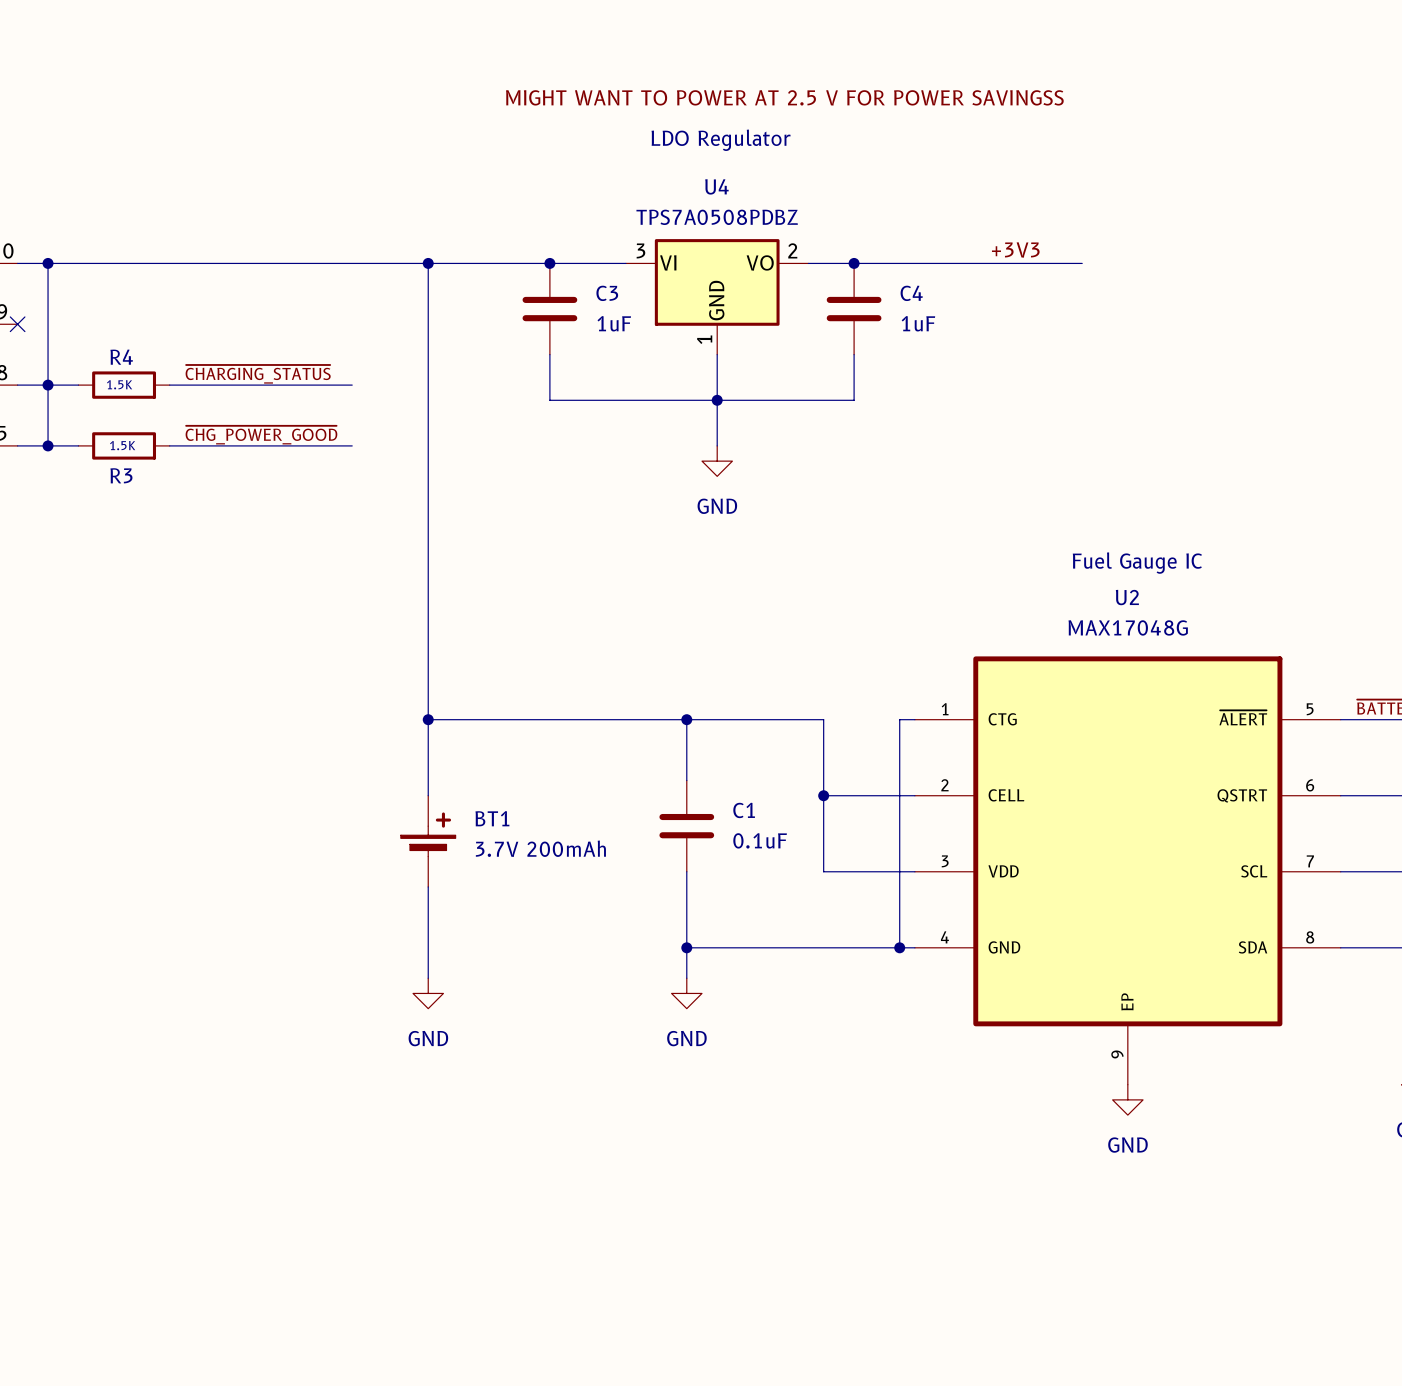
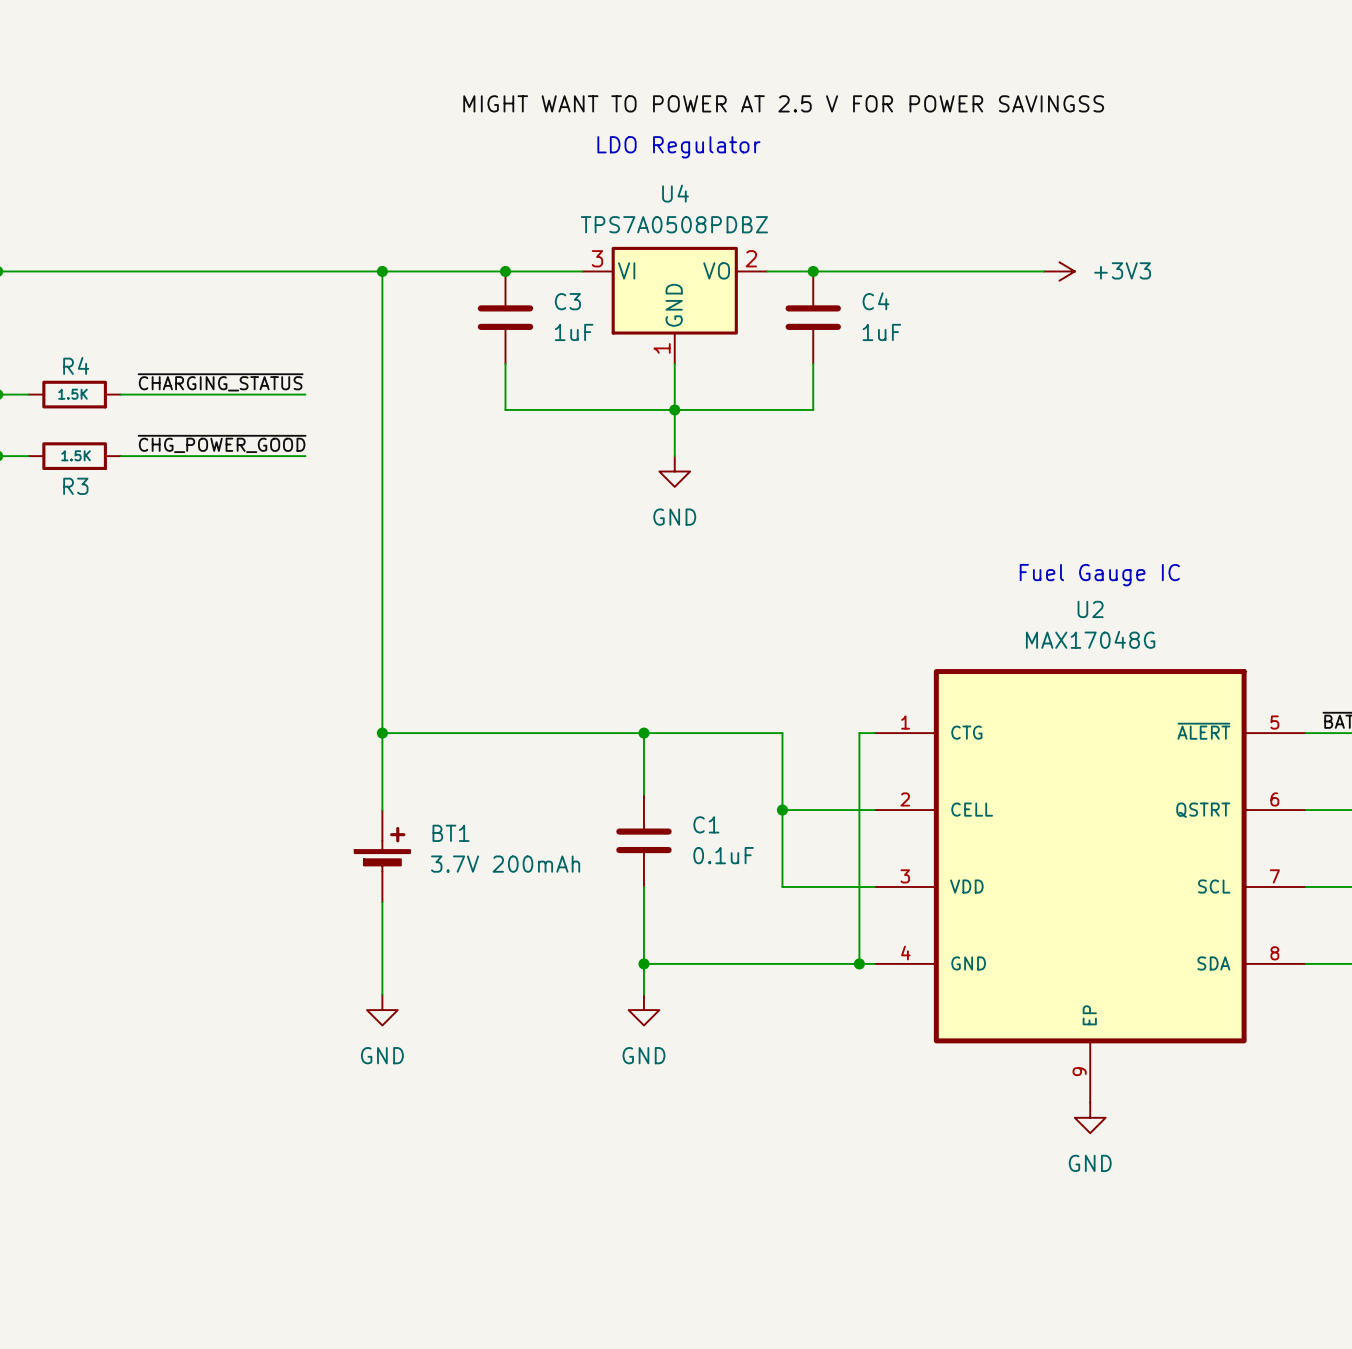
label: +3V3 (1015, 249) -> none
power symbol: none -> +3V3 (1059, 271)

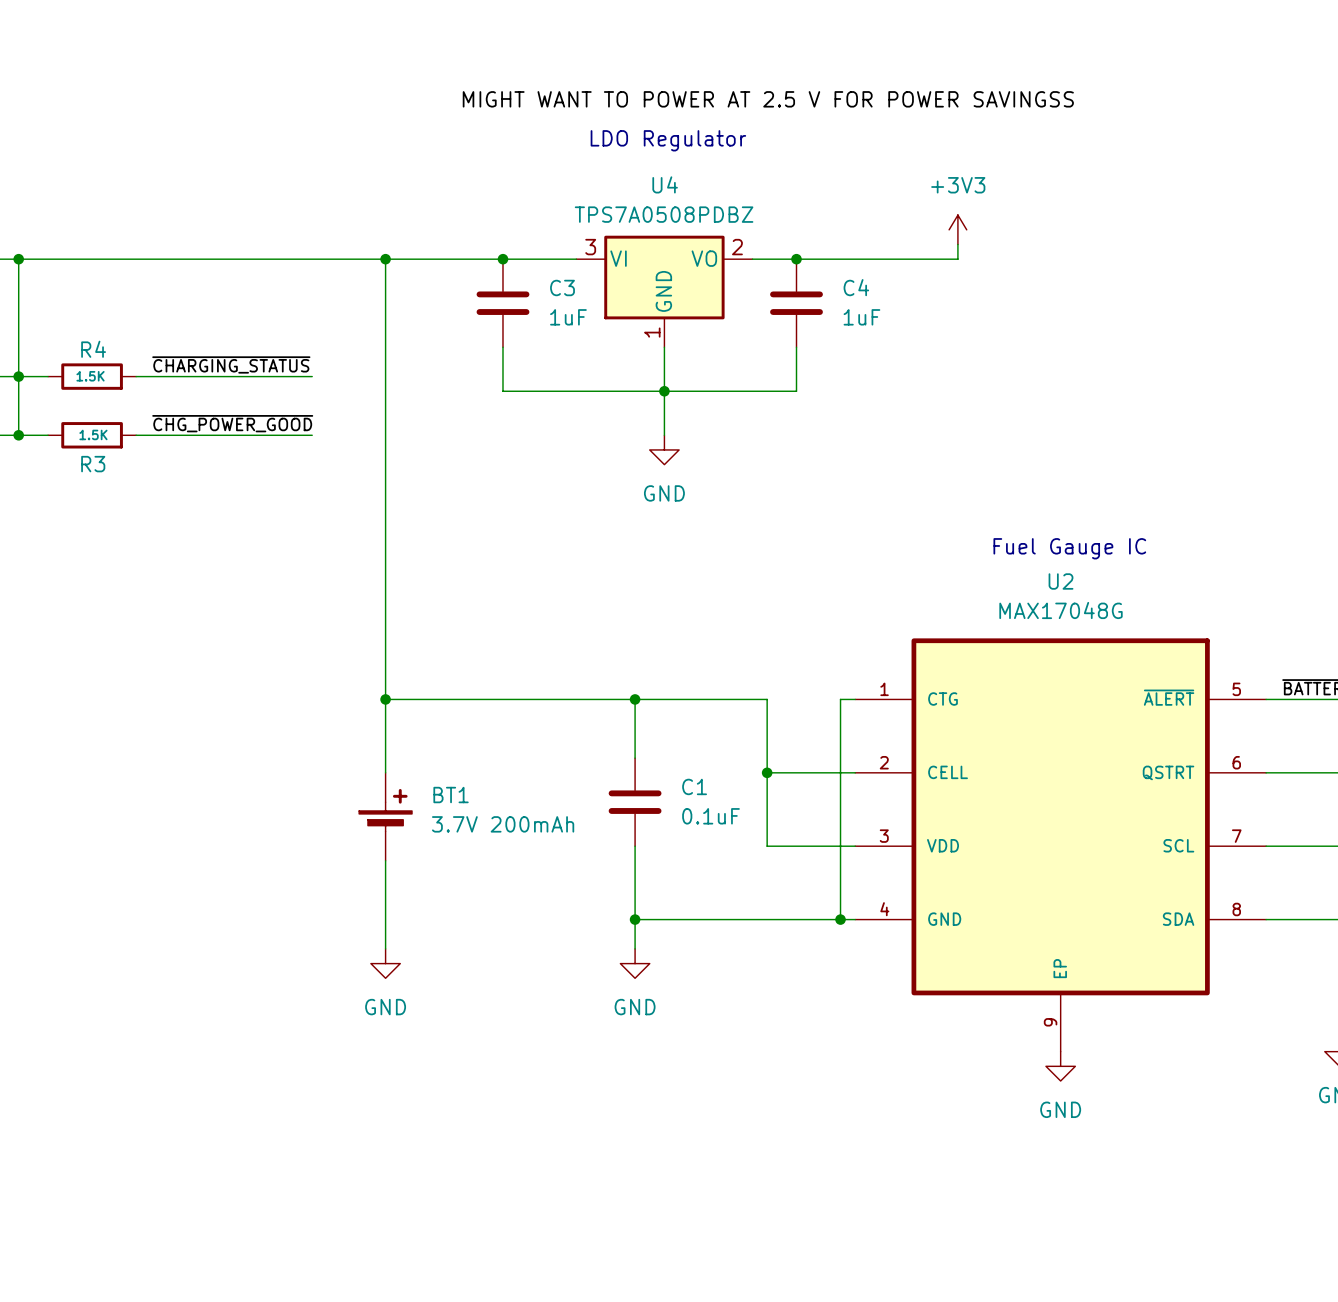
wire: (982, 271) (1044, 271) -> (957, 259) (957, 244)
power symbol rotation: 0° (1059, 271) -> 90° counterclockwise (957, 229)
power symbol position: +3V3 (1059, 271) -> +3V3 (957, 229)

